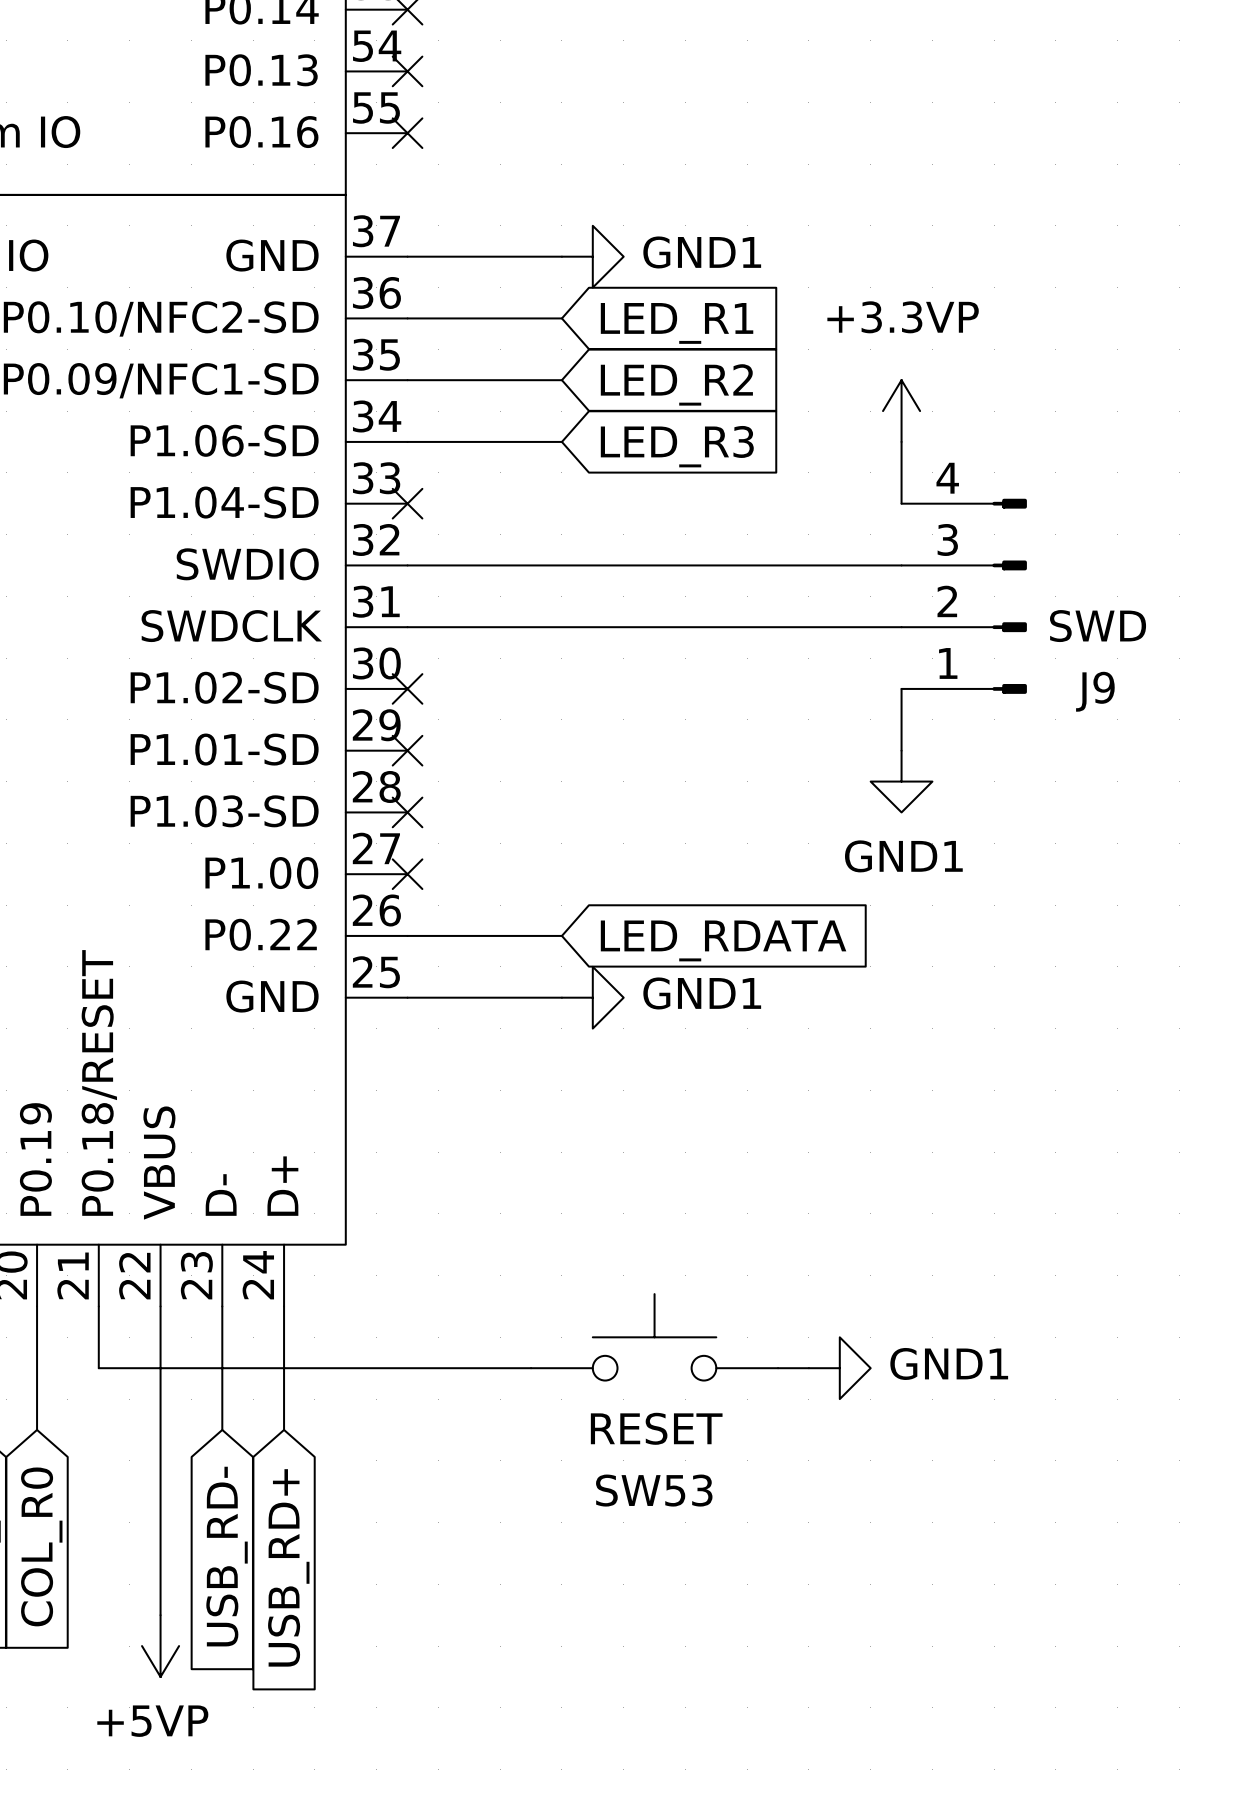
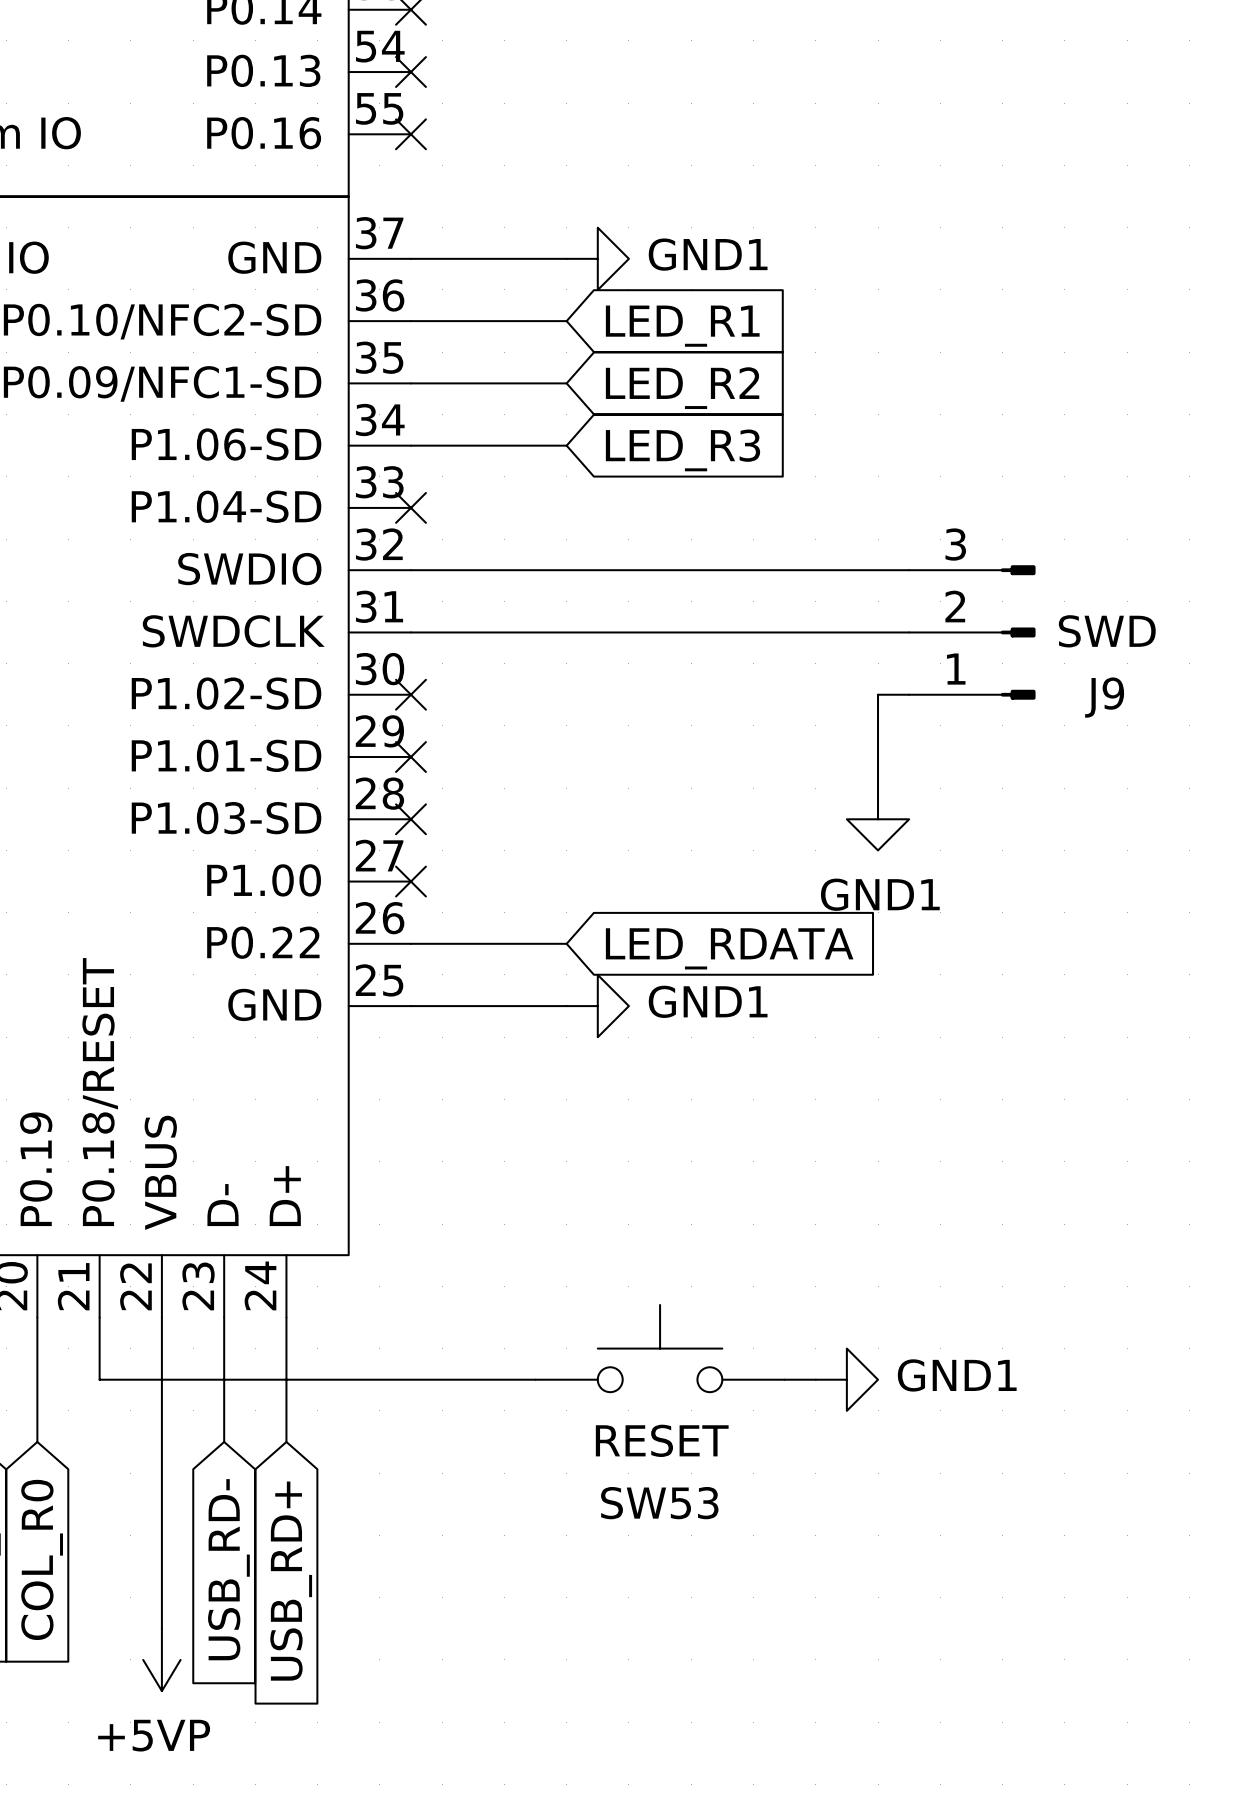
power symbol: +3.3VP (901, 411) -> none
wire: (901, 441) (901, 503) -> none
J9 symbol: [901, 498, 1027, 694] -> [909, 565, 1036, 700]
wire: (901, 688) (901, 750) -> (909, 694) (878, 694) (878, 788)
power symbol position: GND1 (901, 781) -> GND1 (878, 819)

